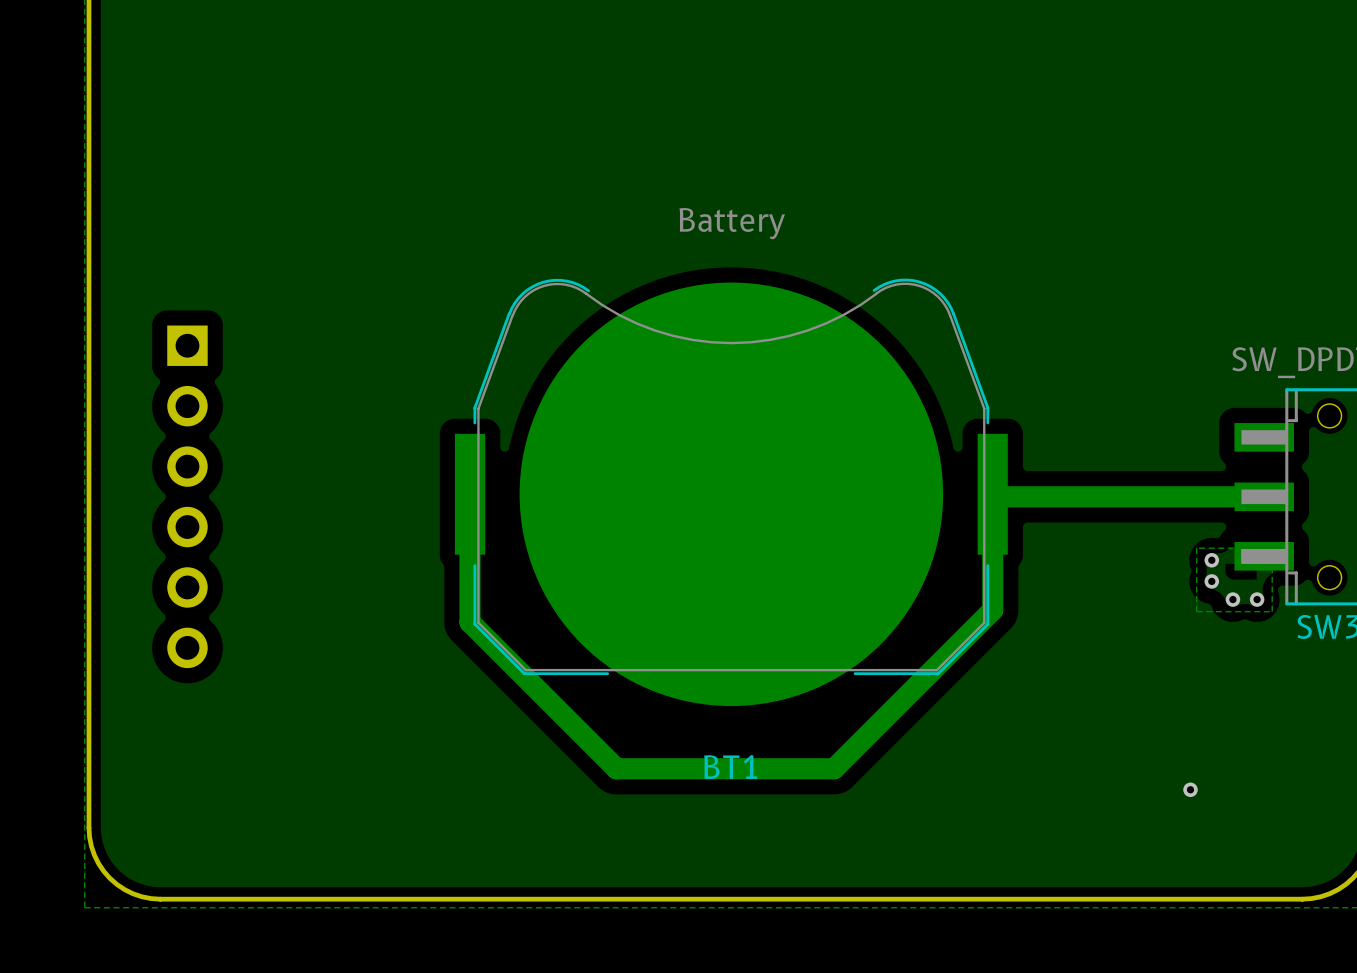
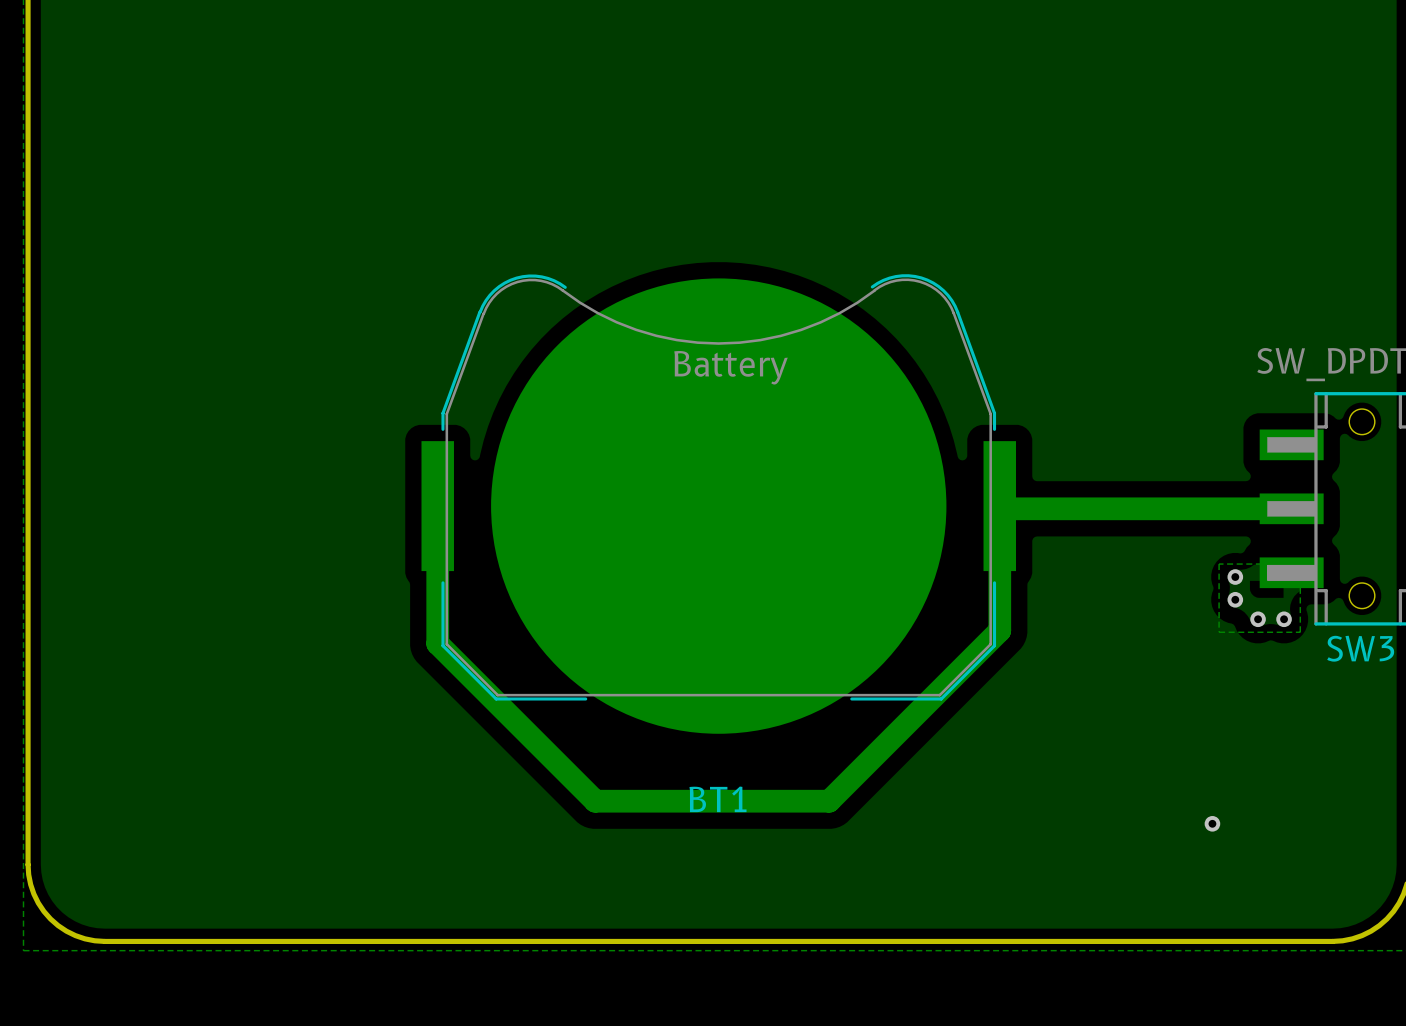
BT1 value position: Battery (732, 223) -> Battery (731, 367)
part: (187, 496) -> none

